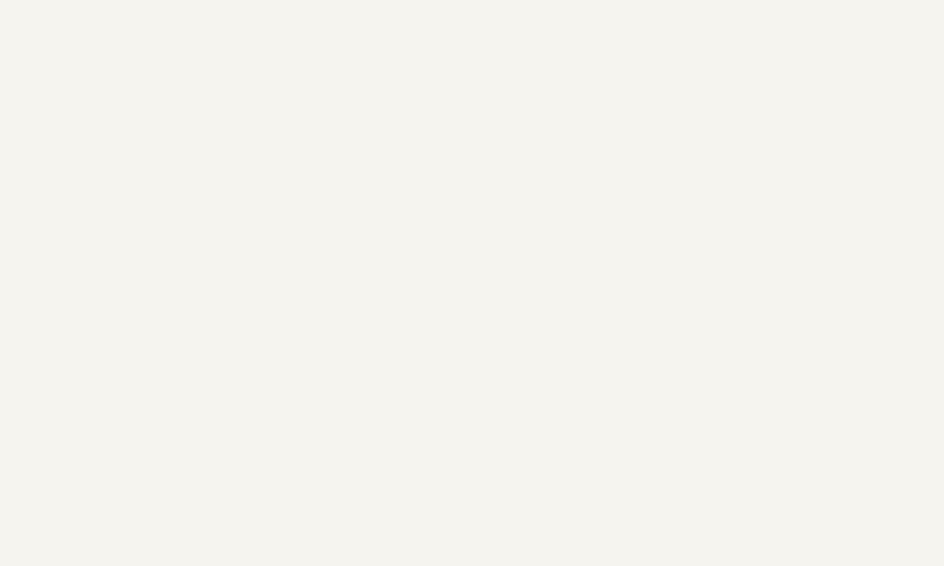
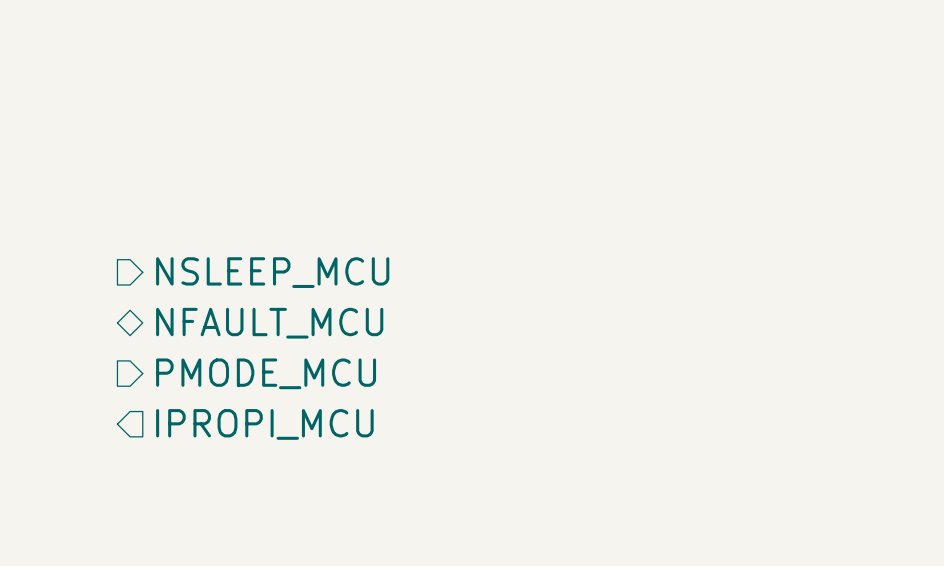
sheet pin: none -> NSLEEP_MCU (272, 272)
sheet pin: none -> NFAULT_MCU (269, 323)
sheet pin: none -> PMODE_MCU (266, 373)
sheet pin: none -> IPROPI_MCU (264, 424)

